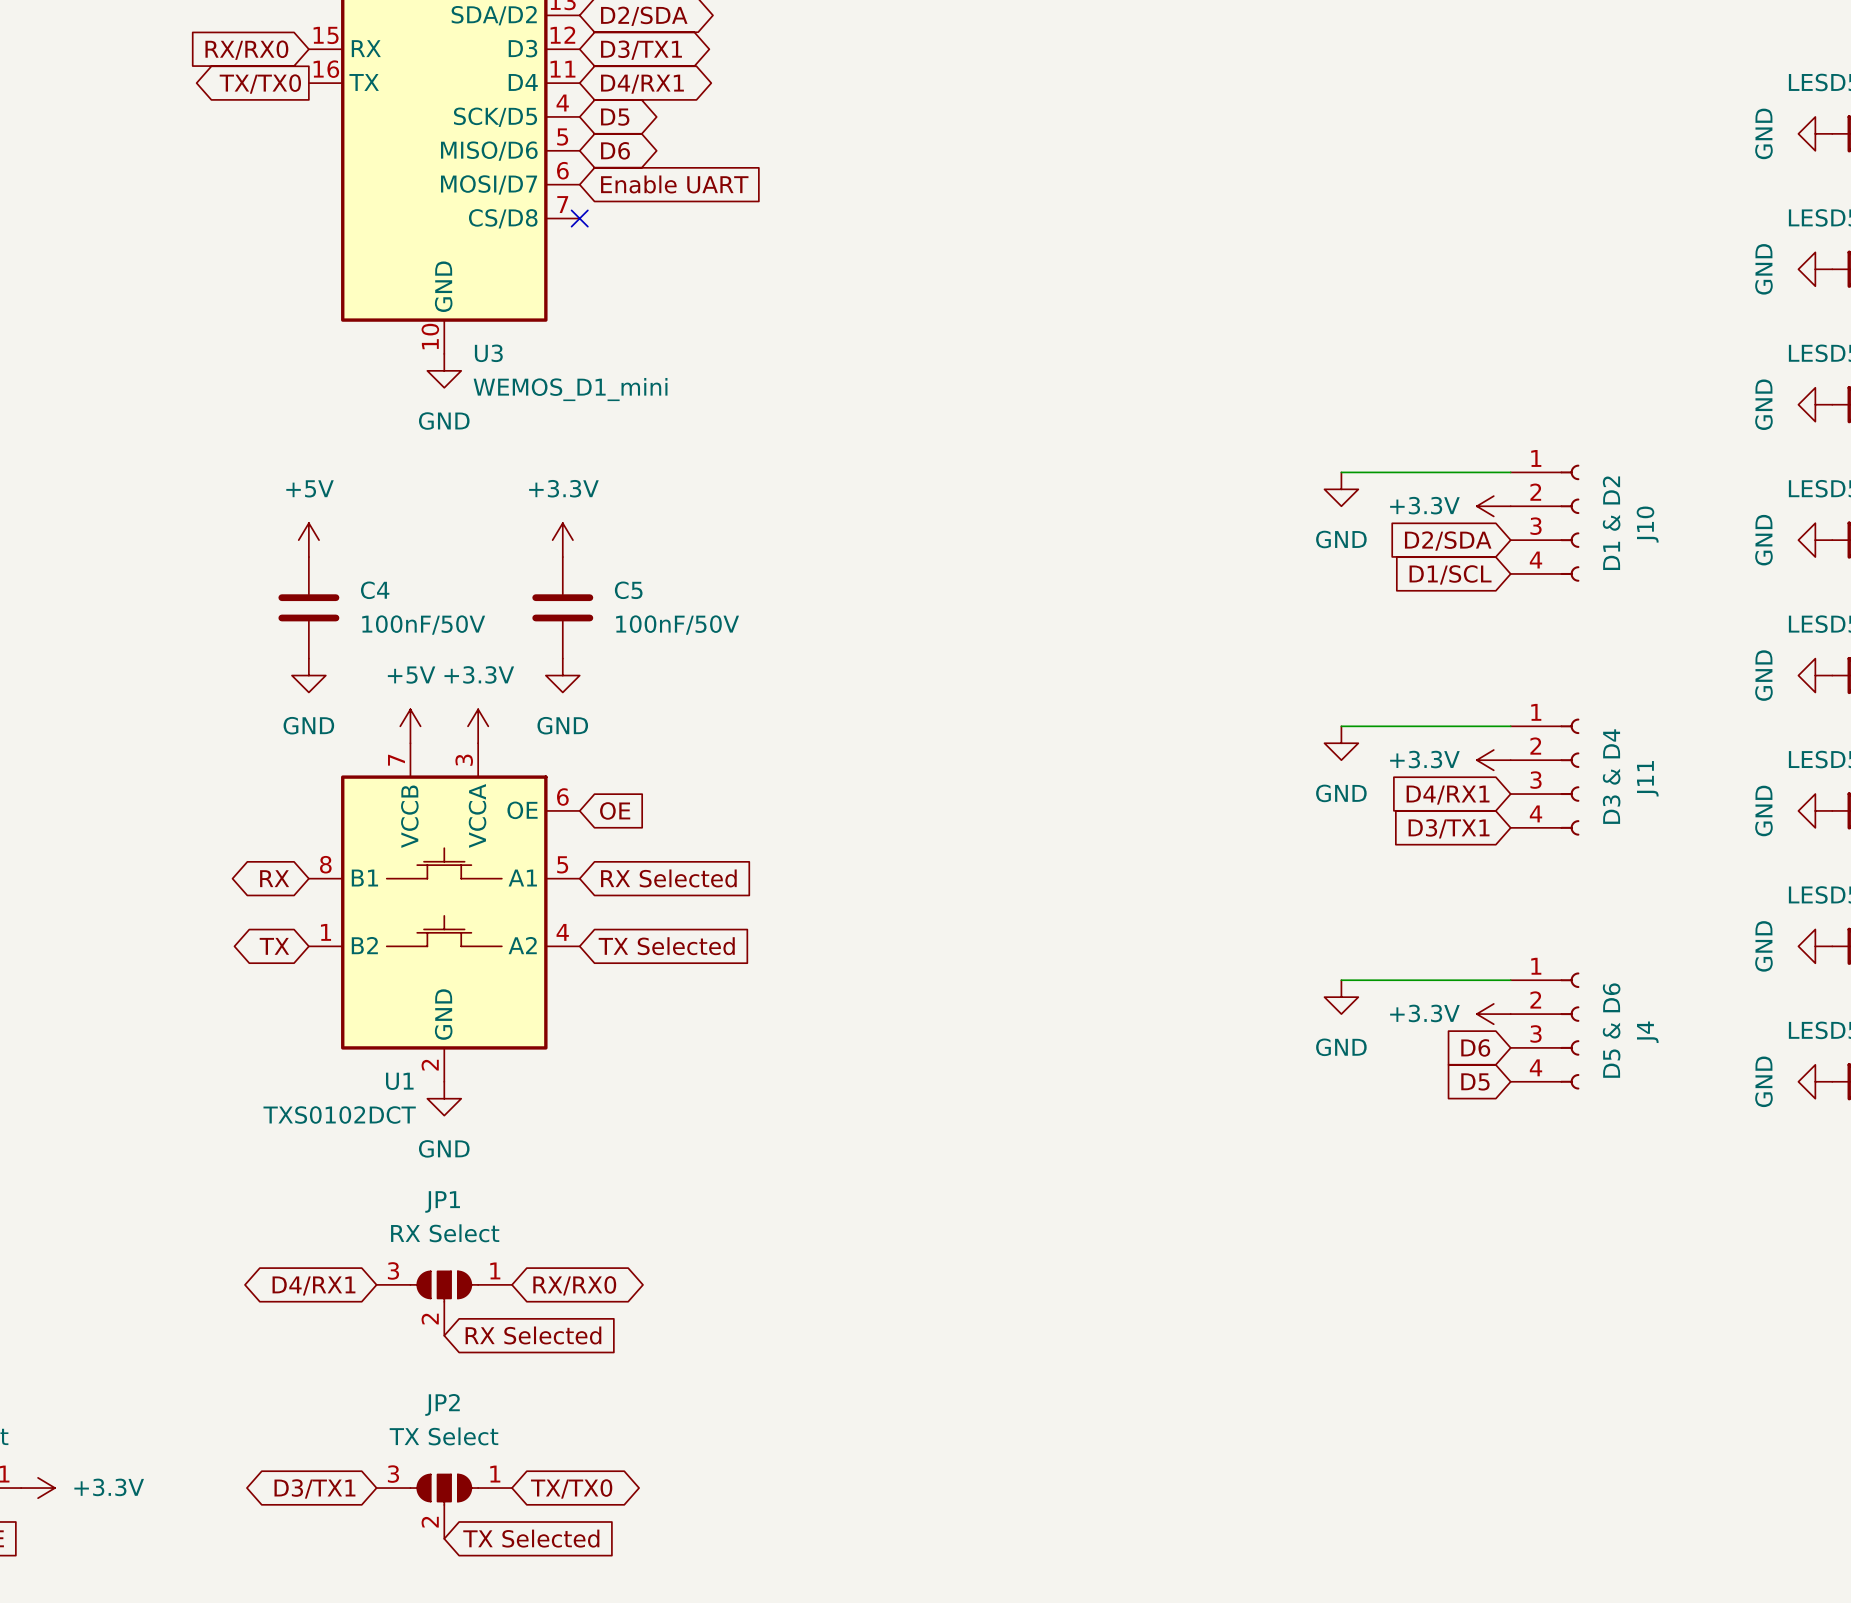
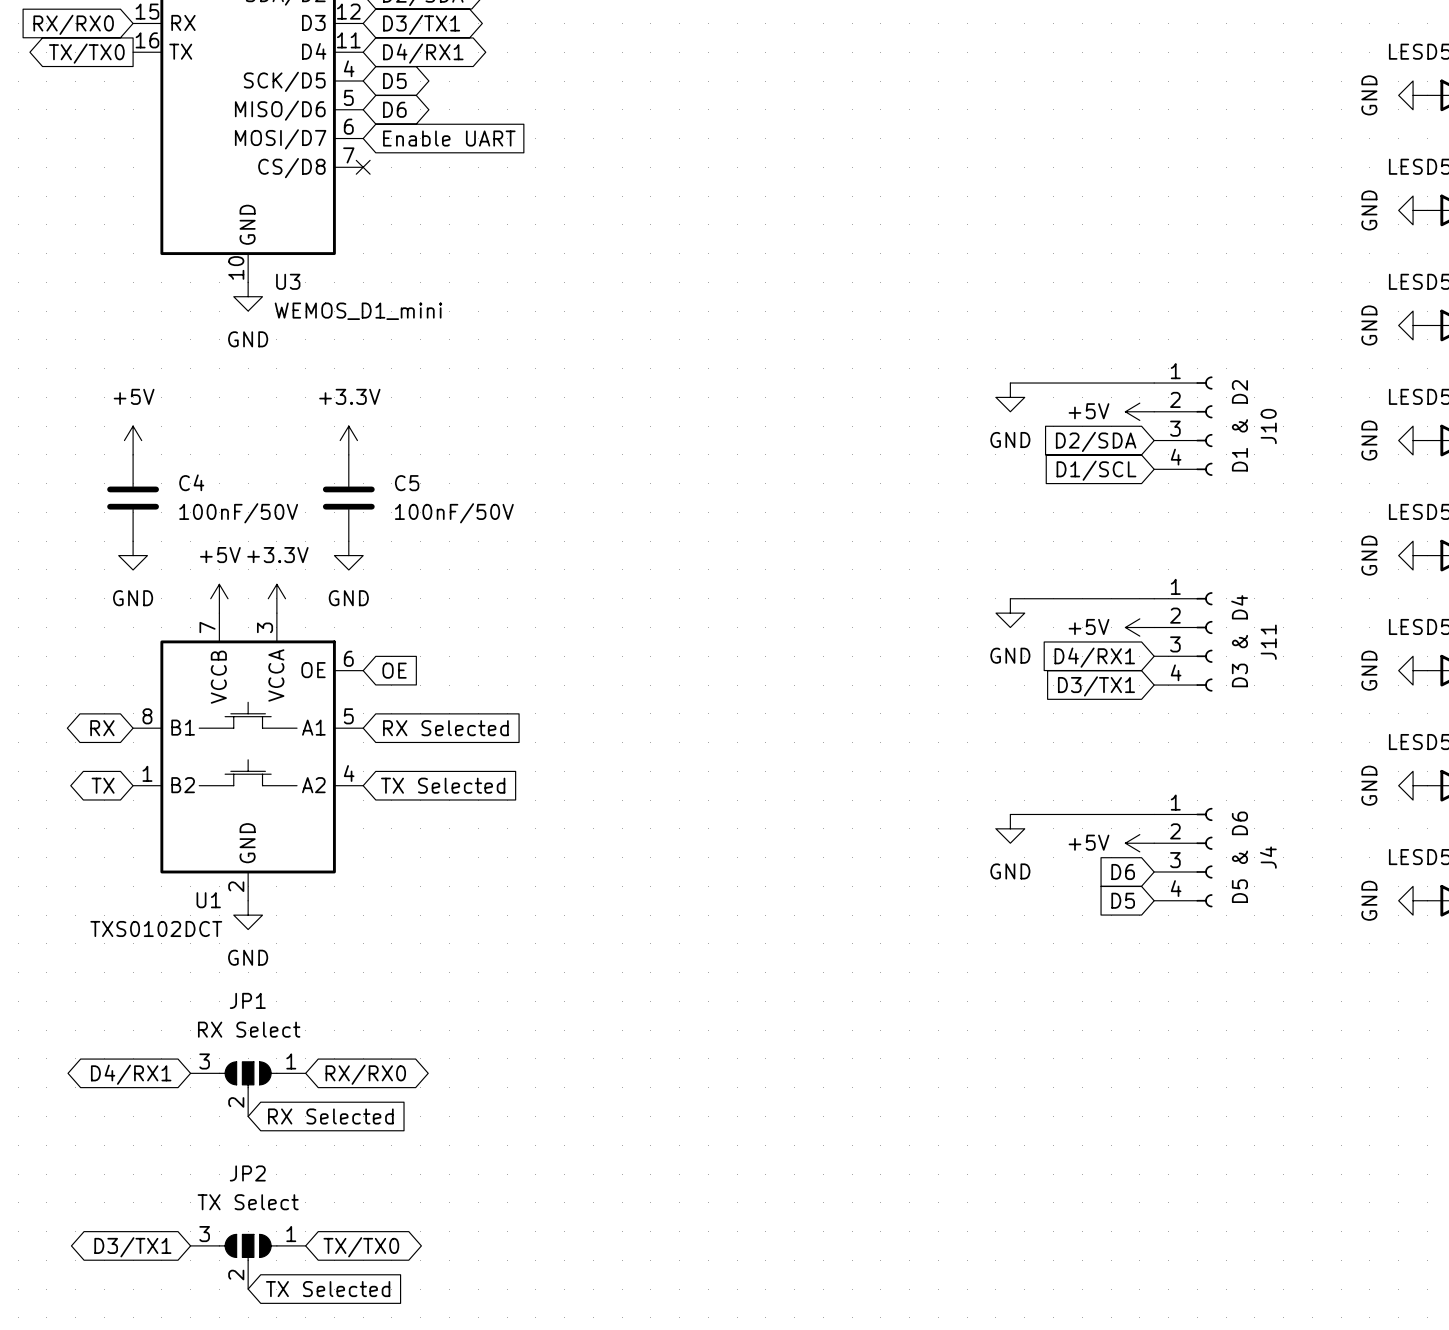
power symbol: +3.3V (1493, 506) -> +5V (1139, 411)
power symbol: +3.3V (1493, 760) -> +5V (1139, 627)
power symbol: +3.3V (1493, 1014) -> +5V (1139, 843)

